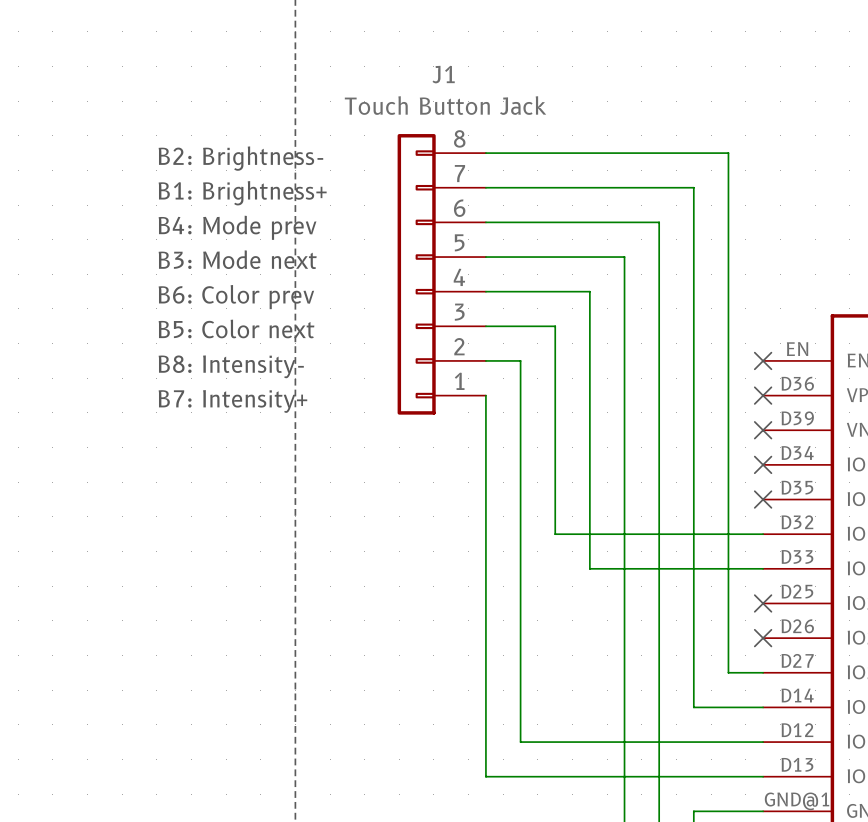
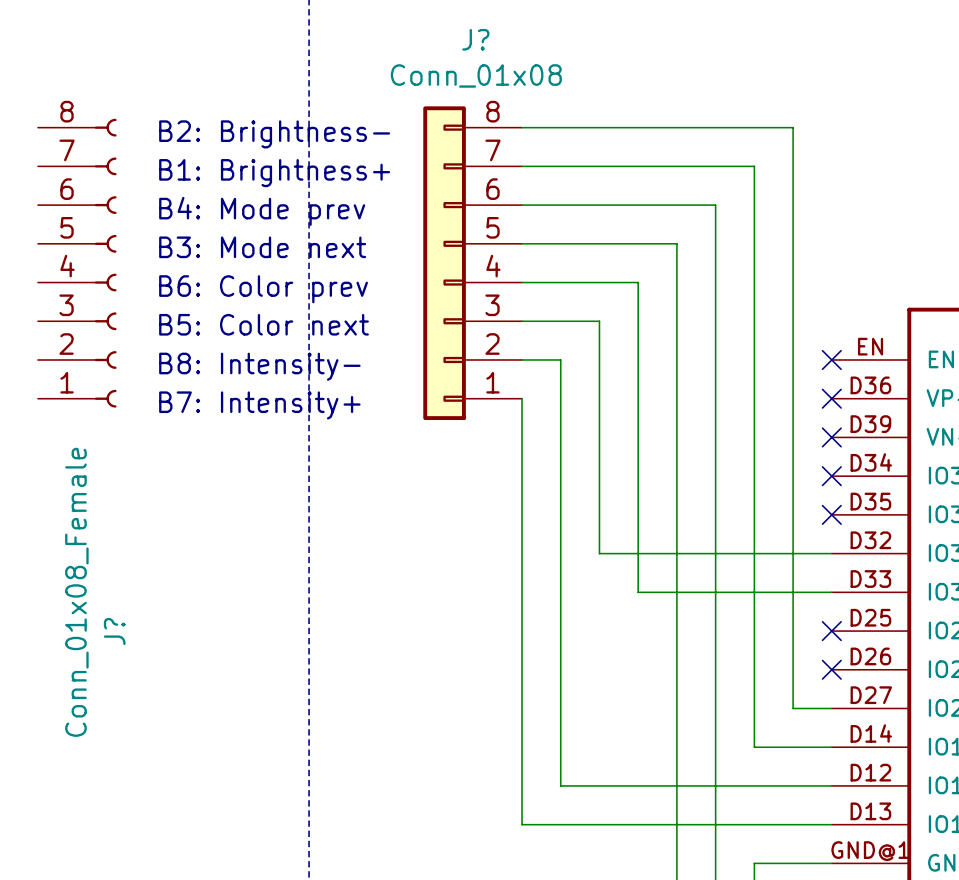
J1 name: J1 (443, 74) -> J? (475, 39)
J1 value: Touch Button Jack (445, 105) -> Conn_01x08 (476, 75)
J?: none -> Conn_01x08_Female (77, 263)

